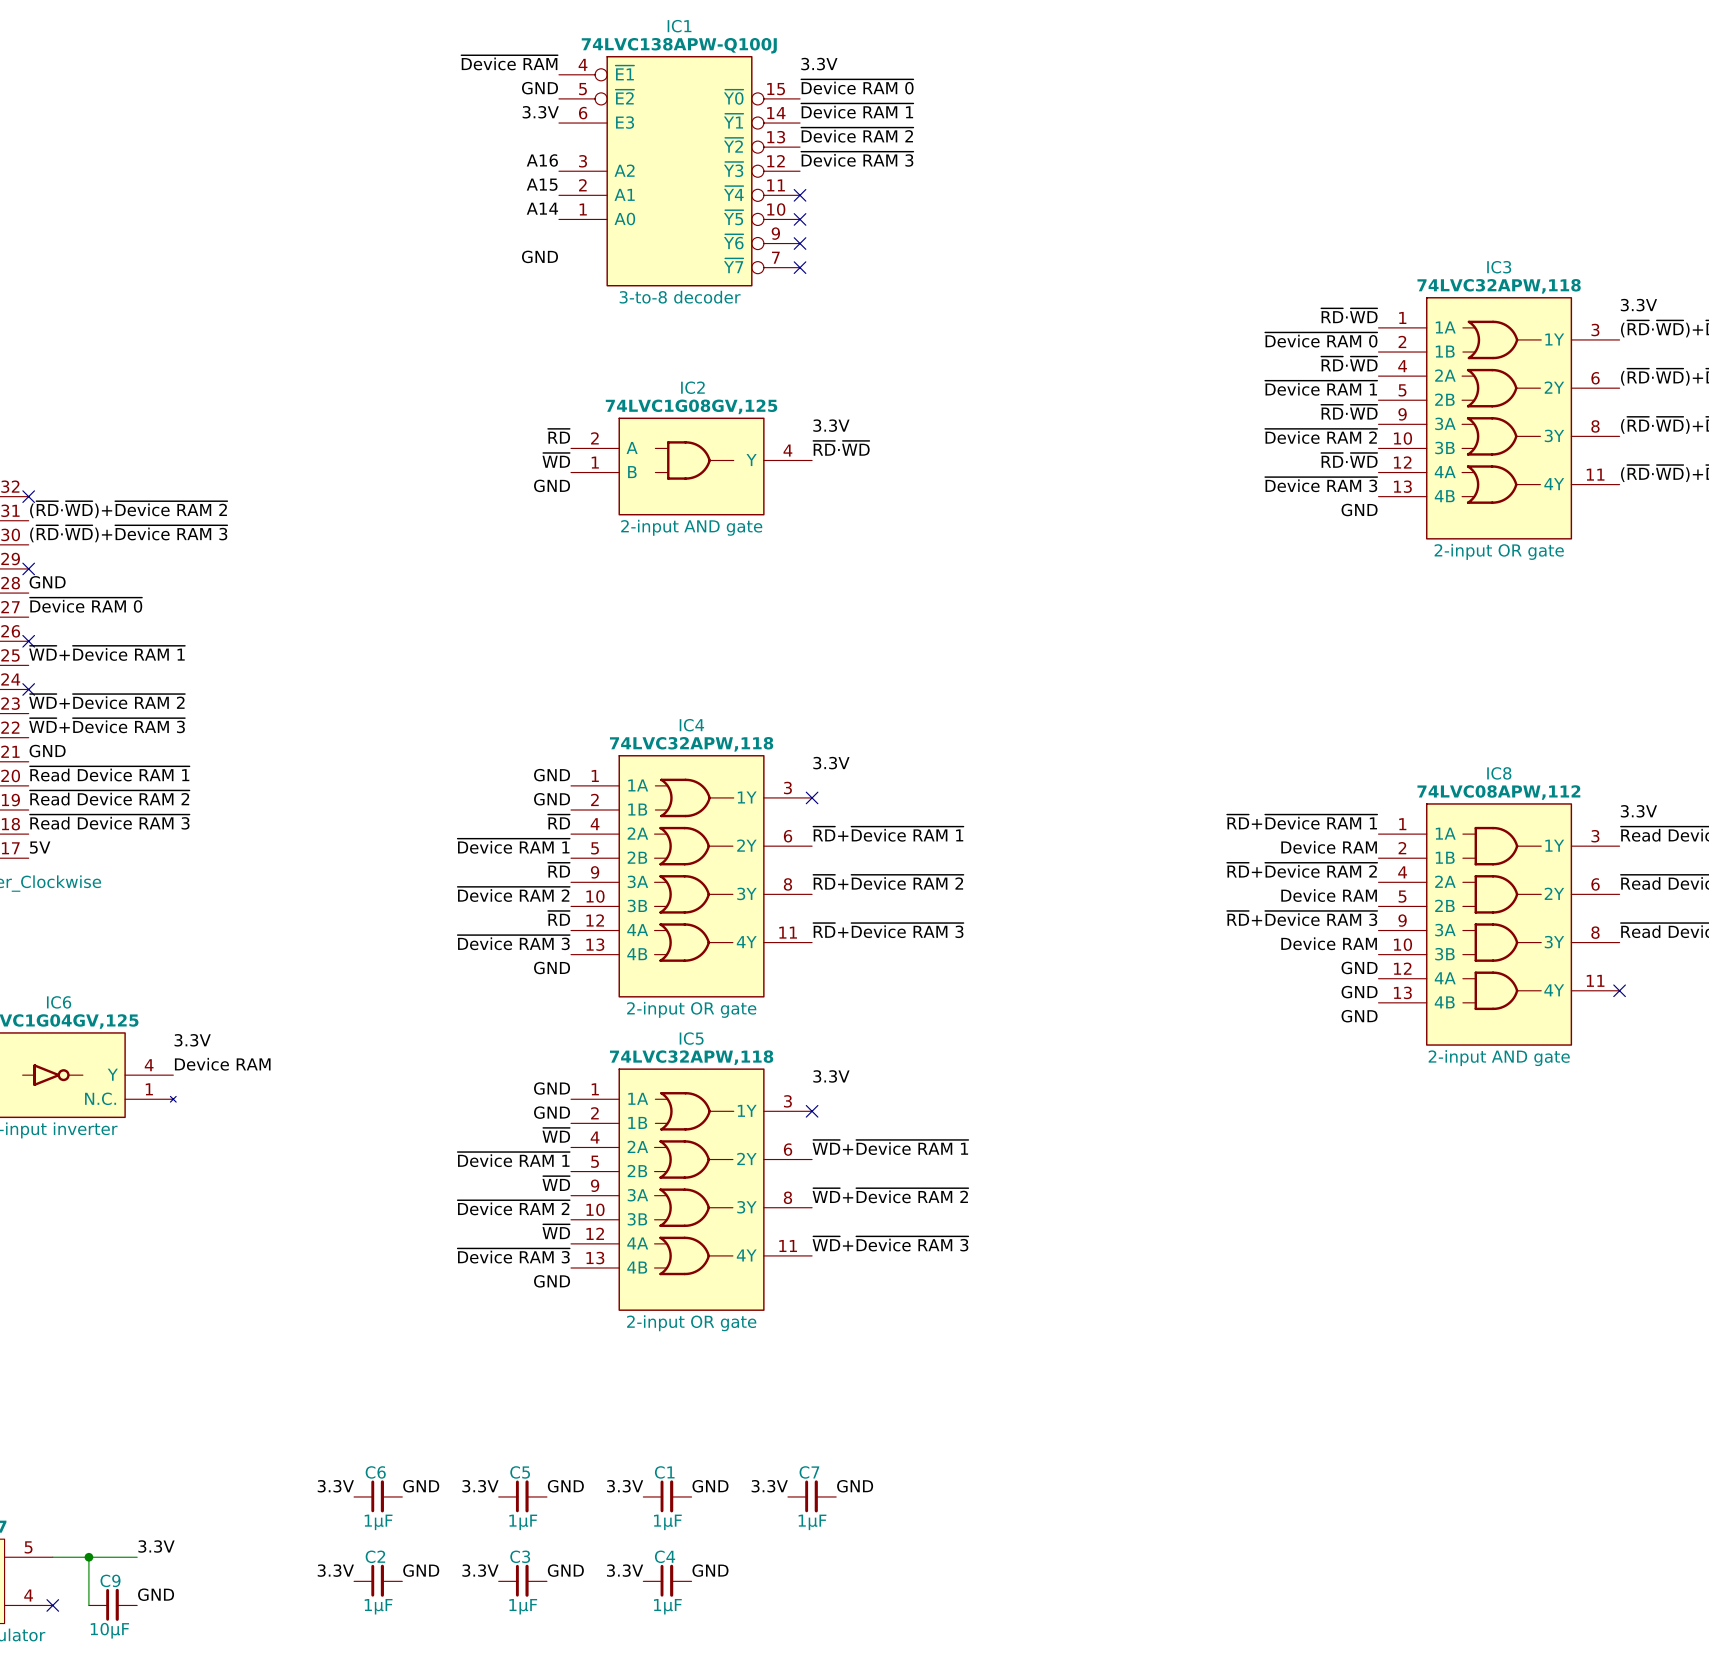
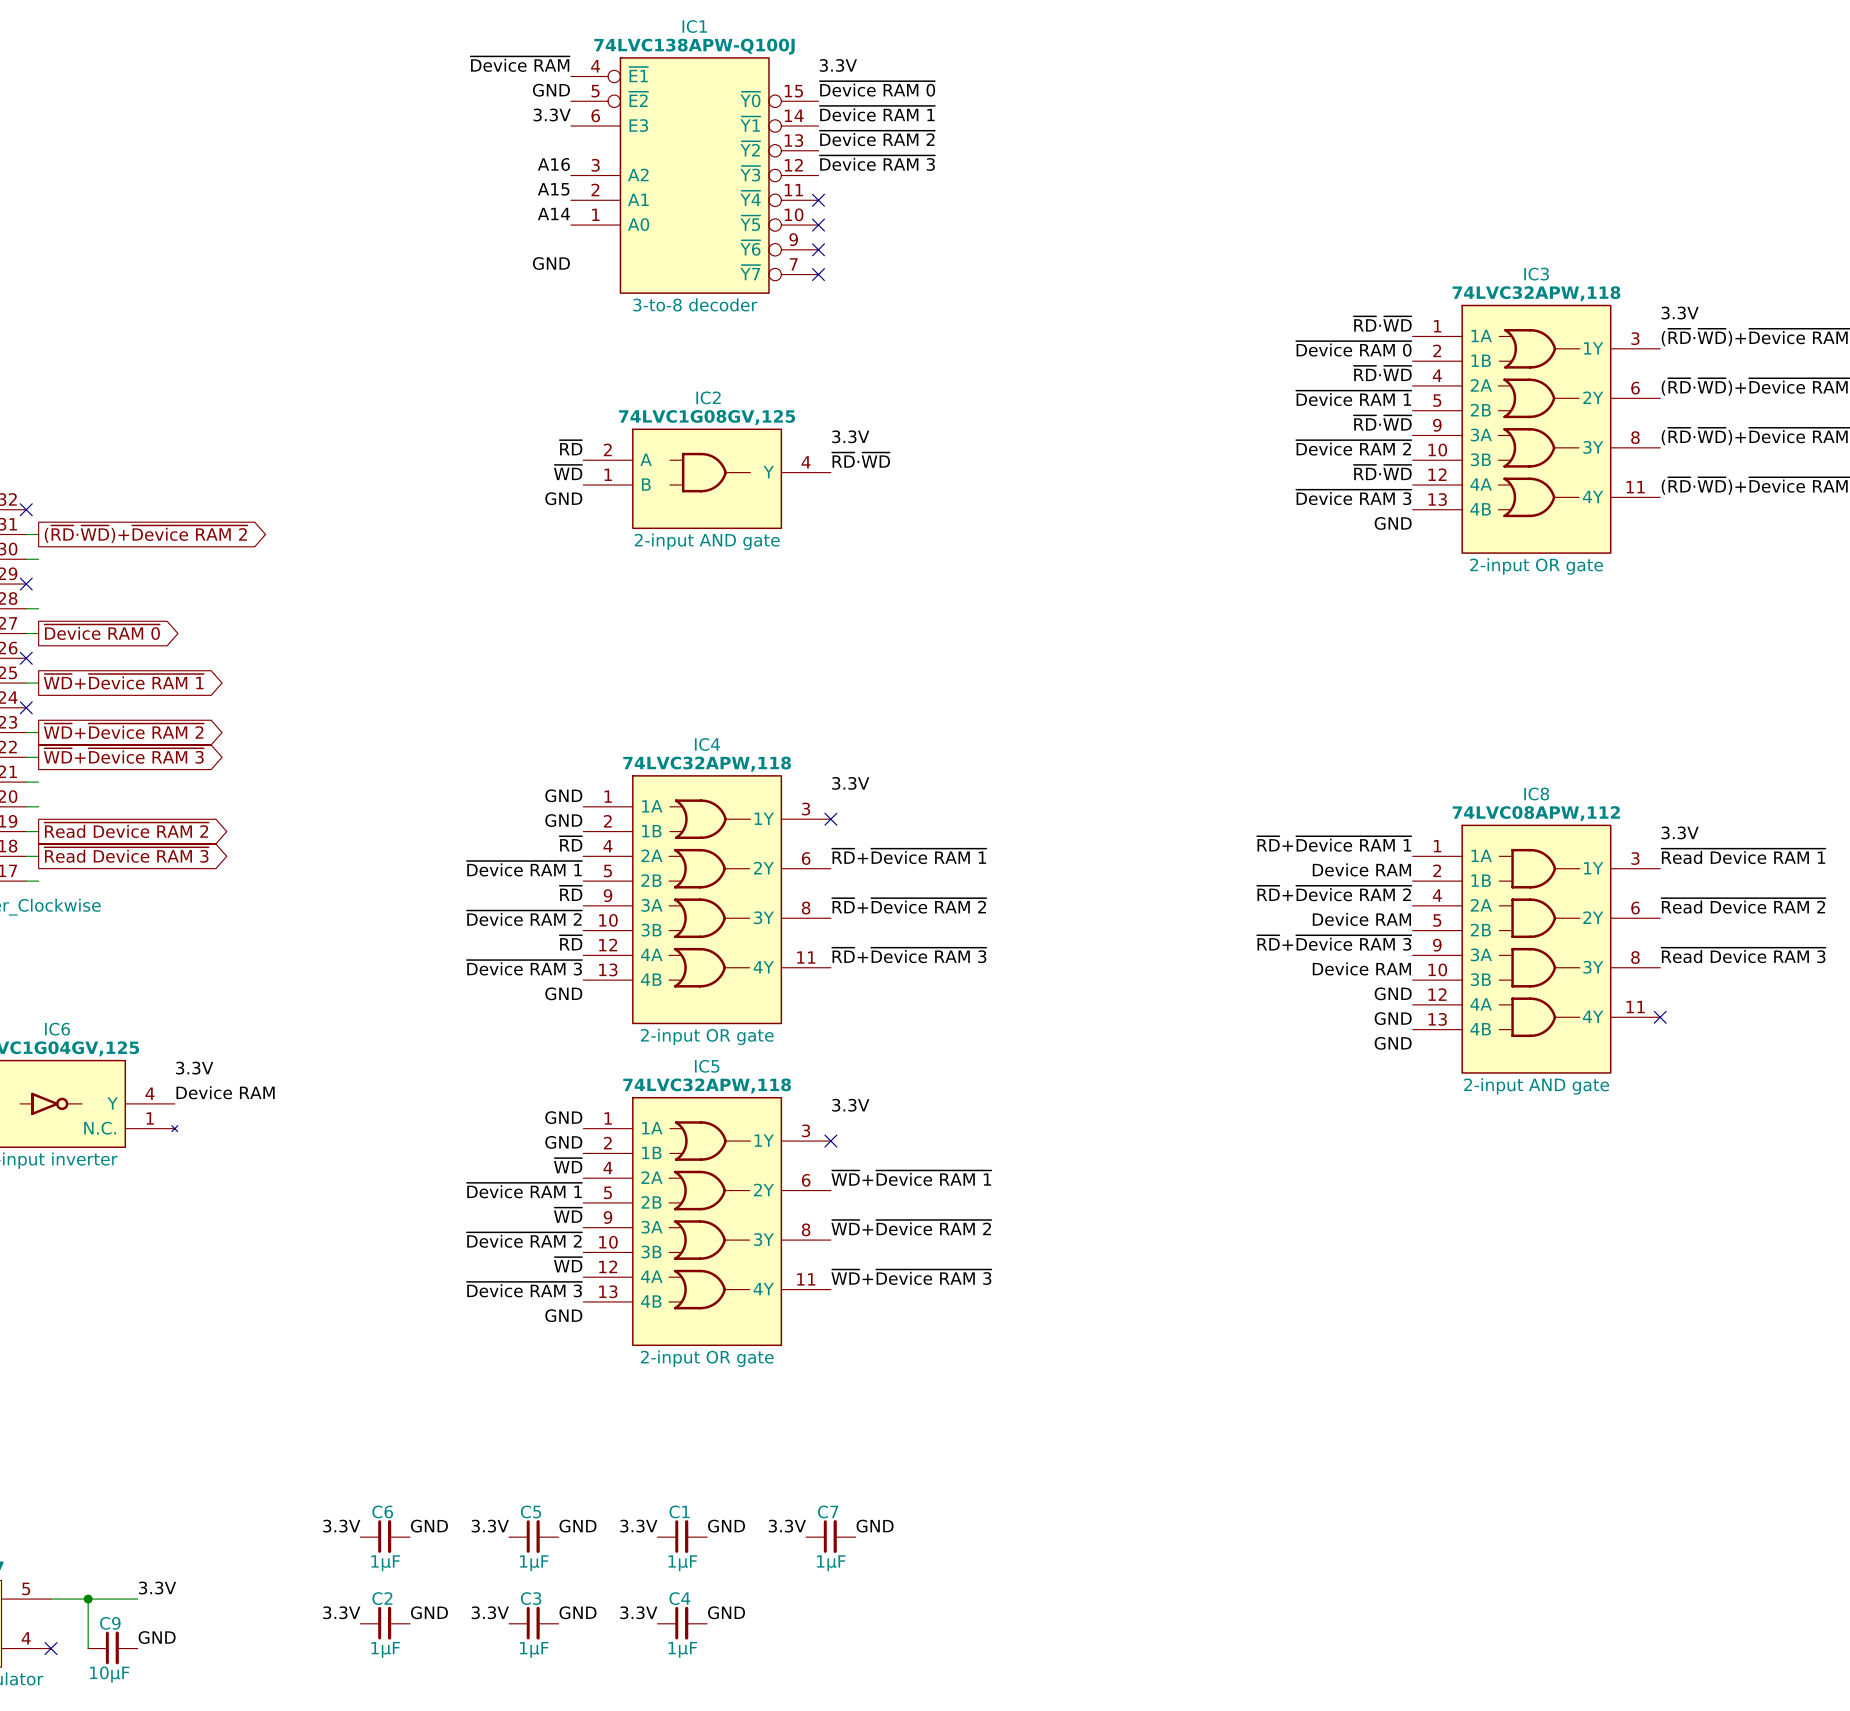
label: (~{RD}·~{WD})+~{Device RAM 2} (128, 509) -> none
wire: none -> (26, 534) (38, 534)
global label: none -> (~{RD}·~{WD})+~{Device RAM 2} (146, 534)
label: (~{RD}·~{WD})+~{Device RAM 3} (128, 533) -> none
wire: none -> (26, 559) (38, 559)
label: GND (47, 582) -> none
wire: none -> (26, 608) (38, 608)
label: ~{Device RAM 0} (86, 605) -> none
global label: none -> ~{Device RAM 0} (102, 632)
wire: none -> (26, 633) (38, 633)
label: ~{WD}+~{Device RAM 1} (107, 653) -> none
global label: none -> ~{WD}+~{Device RAM 1} (123, 681)
wire: none -> (26, 683) (38, 683)
label: ~{WD}+~{Device RAM 2} (107, 701) -> none
global label: none -> ~{WD}+~{Device RAM 2} (123, 731)
wire: none -> (26, 732) (38, 732)
label: ~{WD}+~{Device RAM 3} (107, 725) -> none
global label: none -> ~{WD}+~{Device RAM 3} (123, 756)
wire: none -> (26, 757) (38, 757)
label: GND (47, 751) -> none
wire: none -> (26, 782) (38, 782)
label: ~{Read Device RAM 1} (109, 773) -> none
wire: none -> (26, 806) (38, 806)
label: ~{Read Device RAM 2} (109, 797) -> none
global label: none -> ~{Read Device RAM 2} (126, 830)
wire: none -> (26, 831) (38, 831)
label: ~{Read Device RAM 3} (109, 822) -> none
global label: none -> ~{Read Device RAM 3} (126, 855)
wire: none -> (26, 856) (38, 856)
label: 5V (40, 847) -> none
wire: none -> (26, 881) (38, 881)

